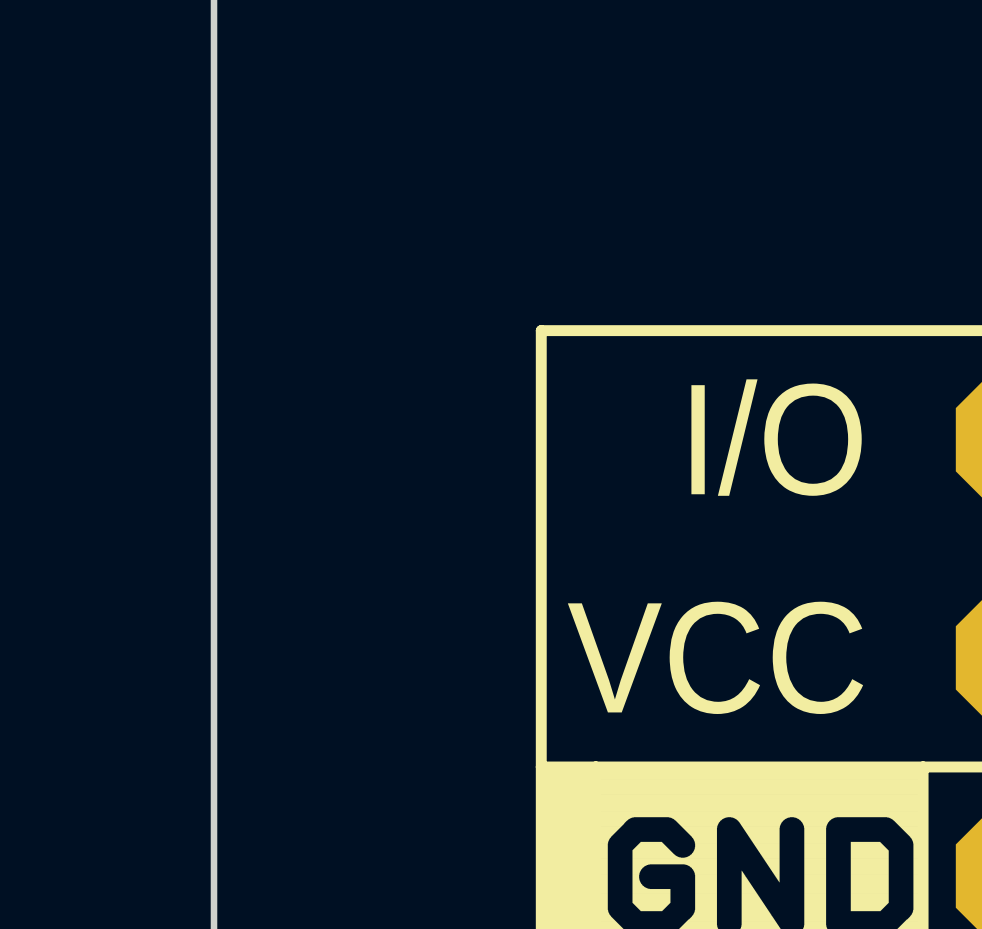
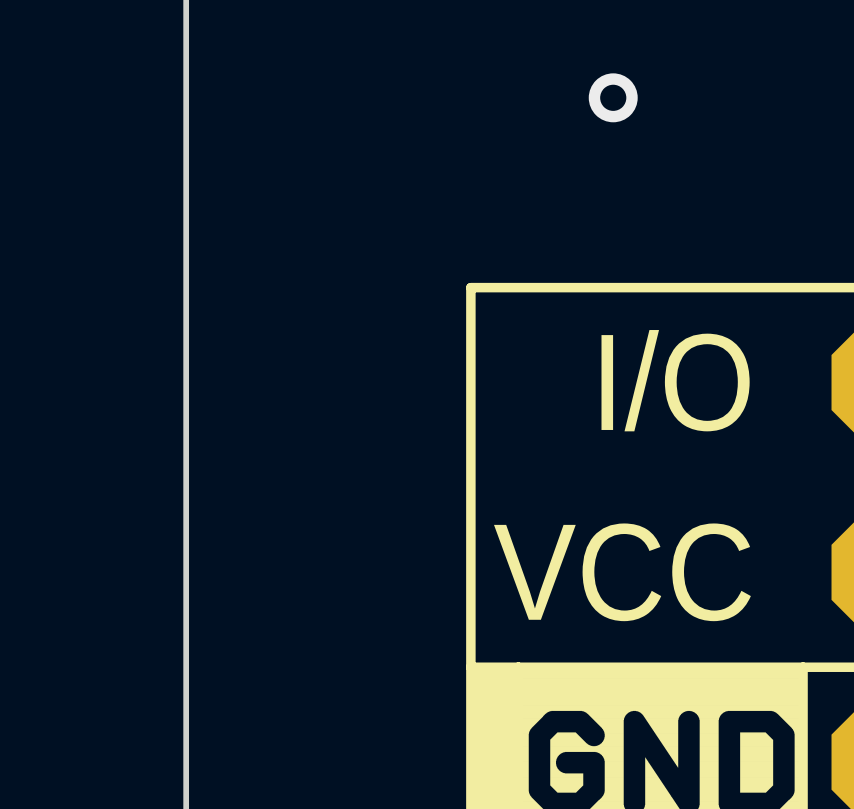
via: none -> (613, 97)

